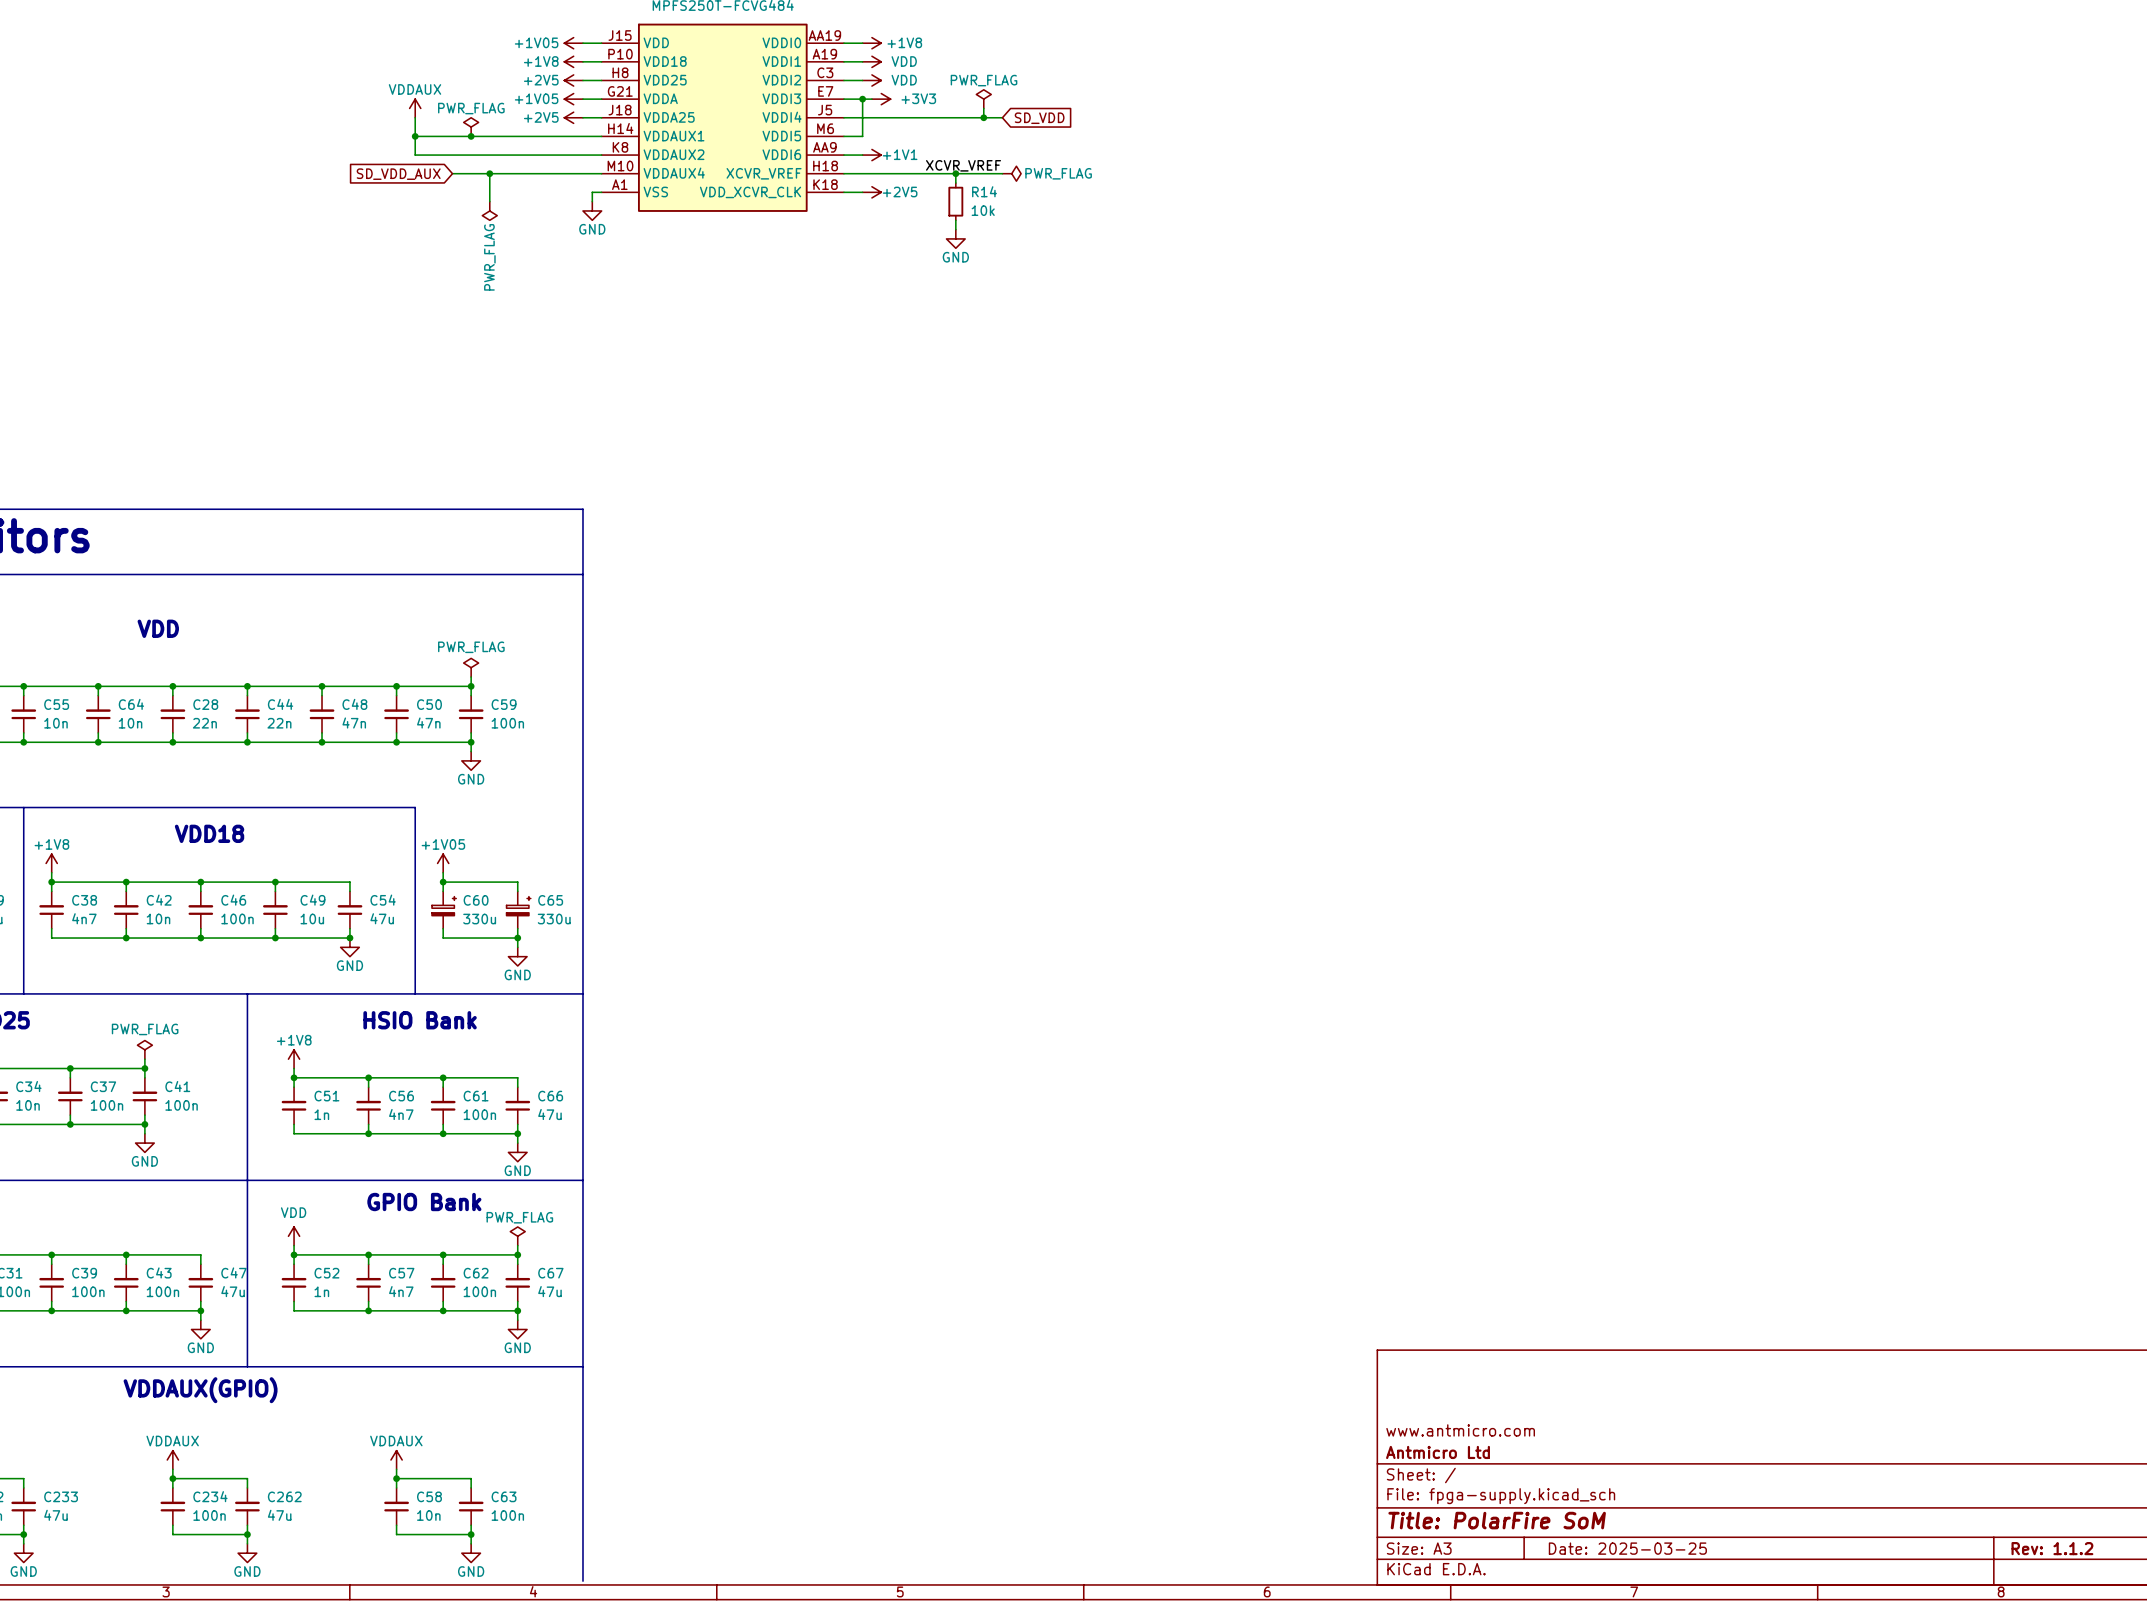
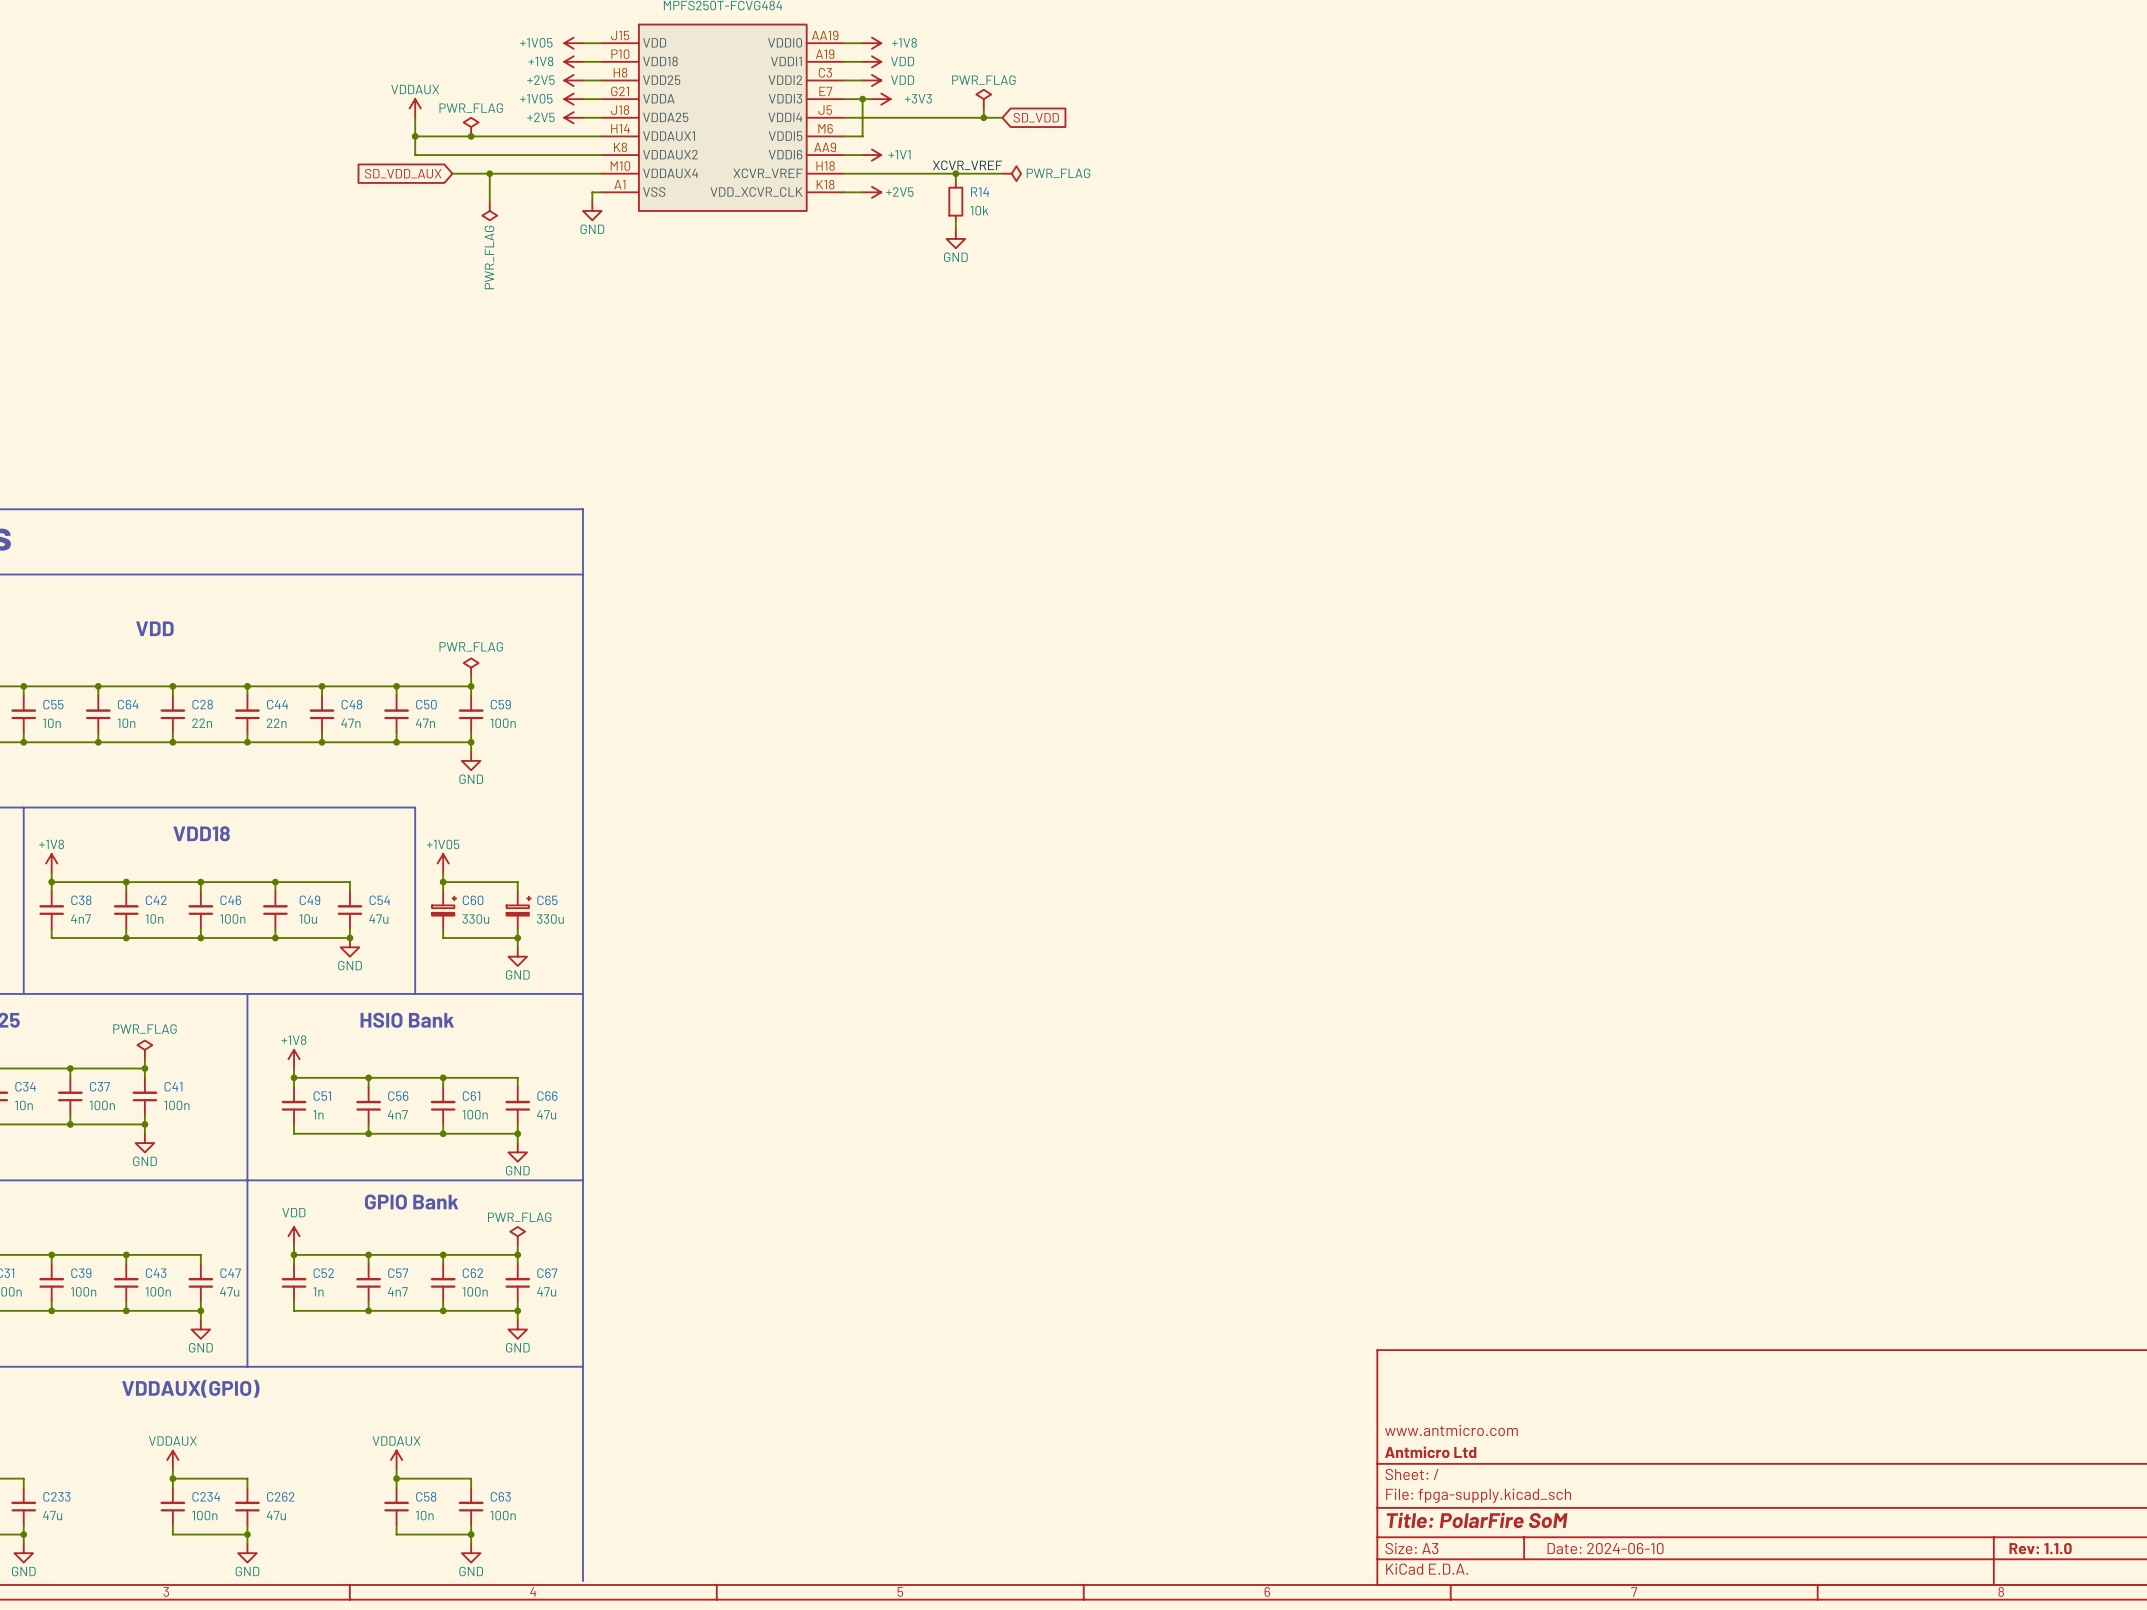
title block: Date: 2025-03-25 (1627, 1548) -> Date: 2024-06-10 (1605, 1548)
title block: Rev: 1.1.2 (2052, 1548) -> Rev: 1.1.0 (2040, 1548)

